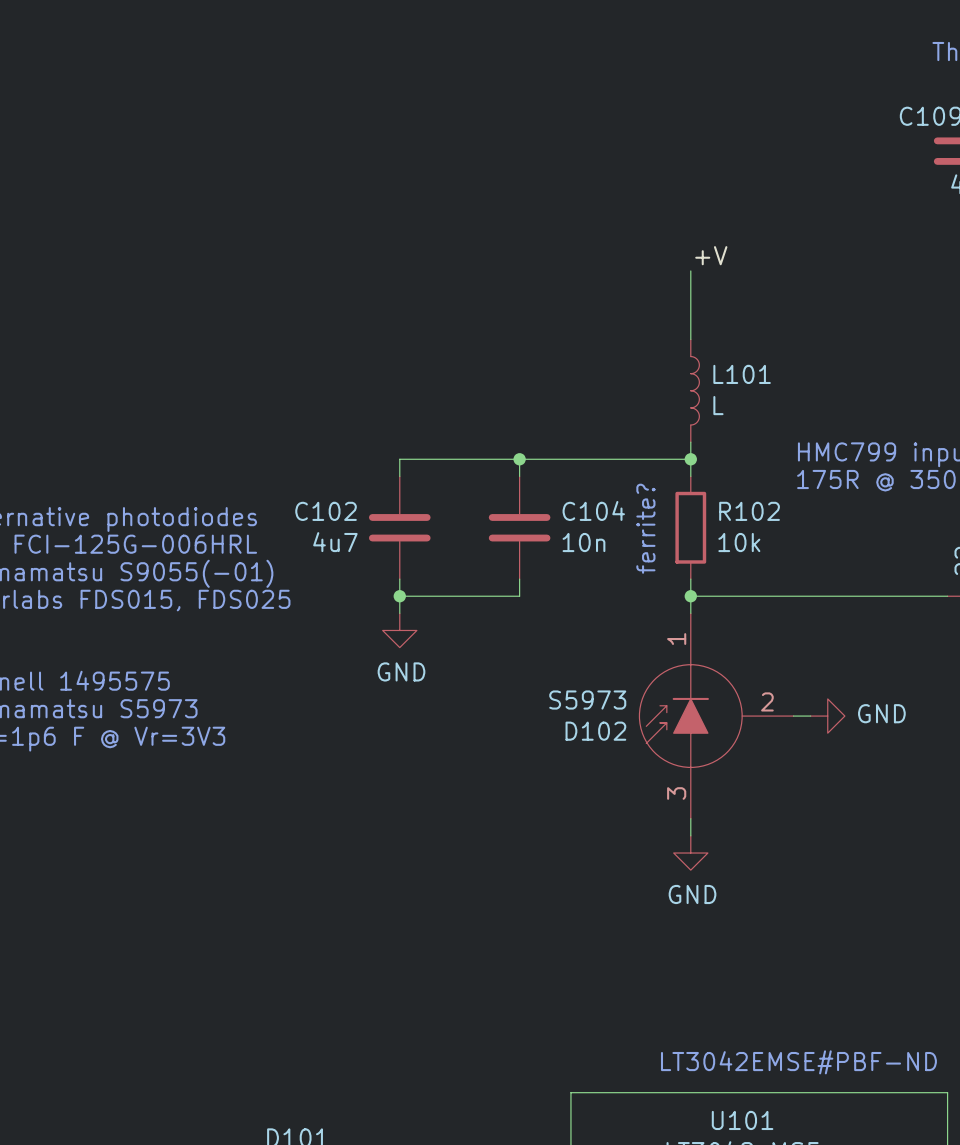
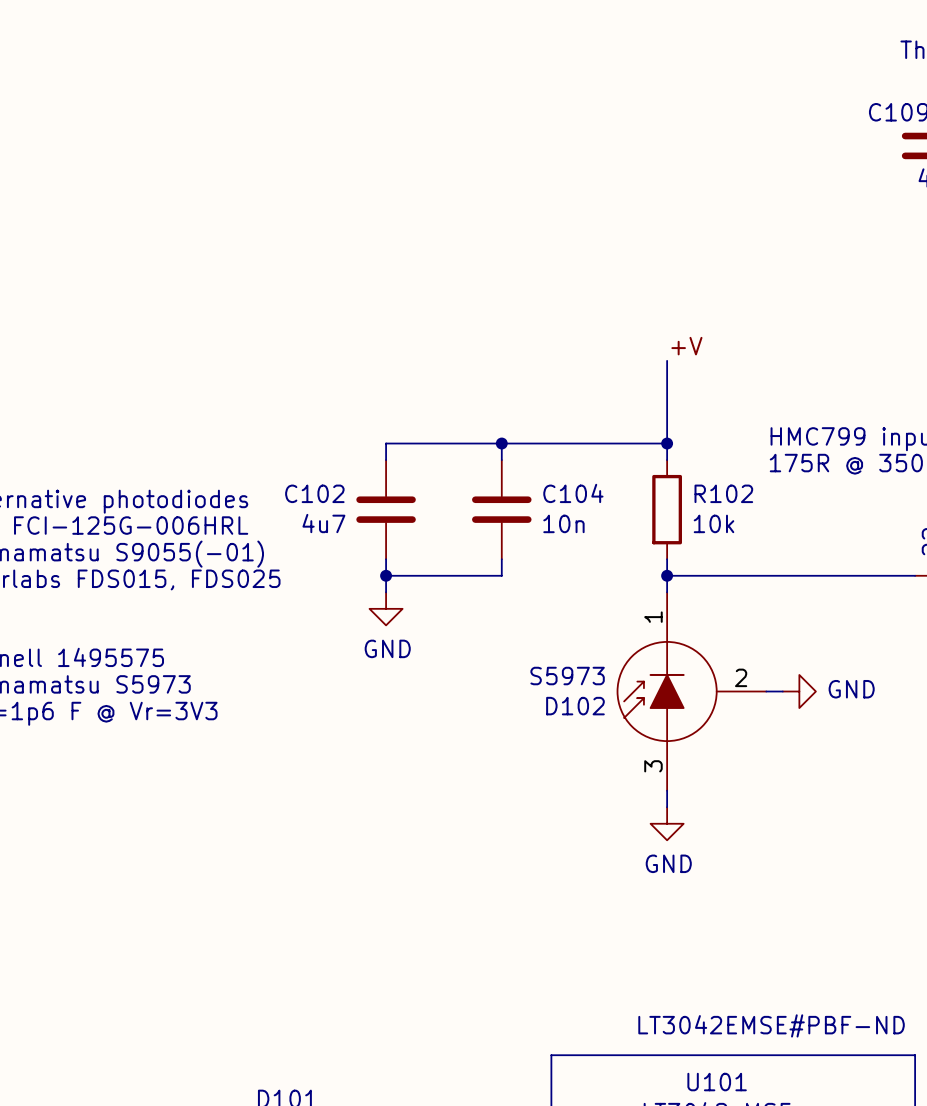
label position: +V (711, 255) -> +V (686, 346)
wire: (690, 270) (690, 339) -> (667, 360) (667, 427)
L101: L (695, 390) -> none
text: ferrite? (645, 528) -> none

